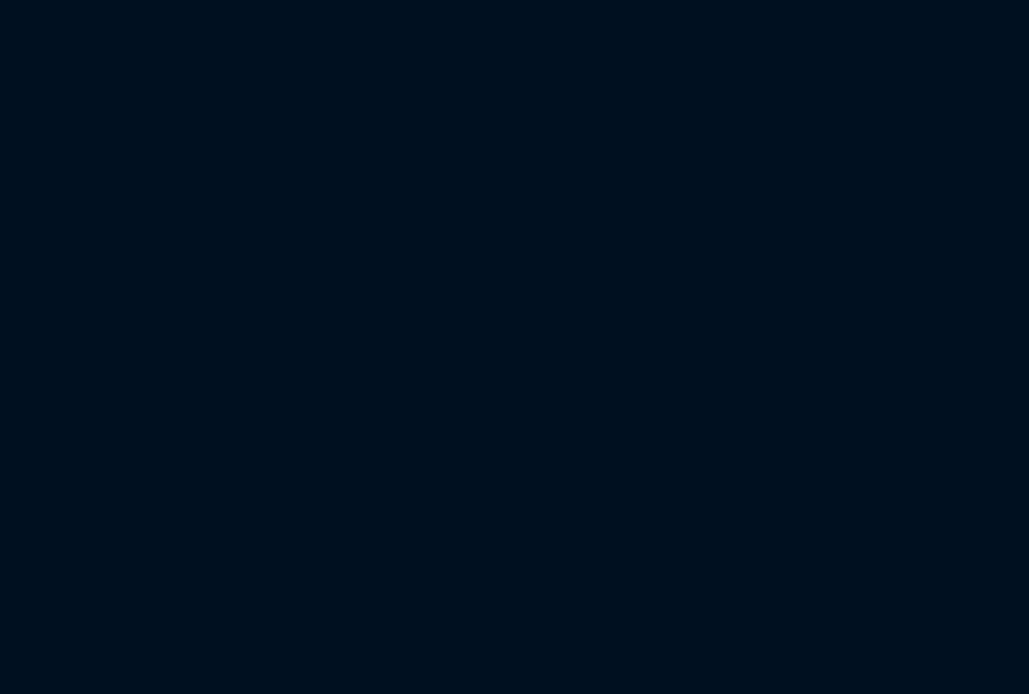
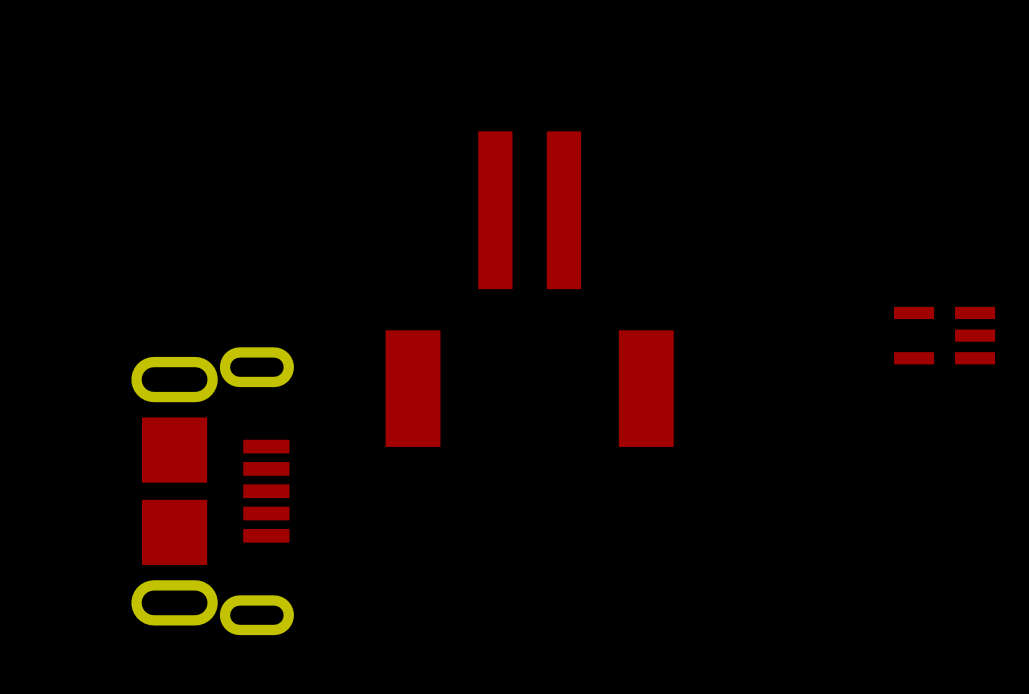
part: none -> (529, 289)
part: none -> (944, 335)
part: none -> (212, 491)

